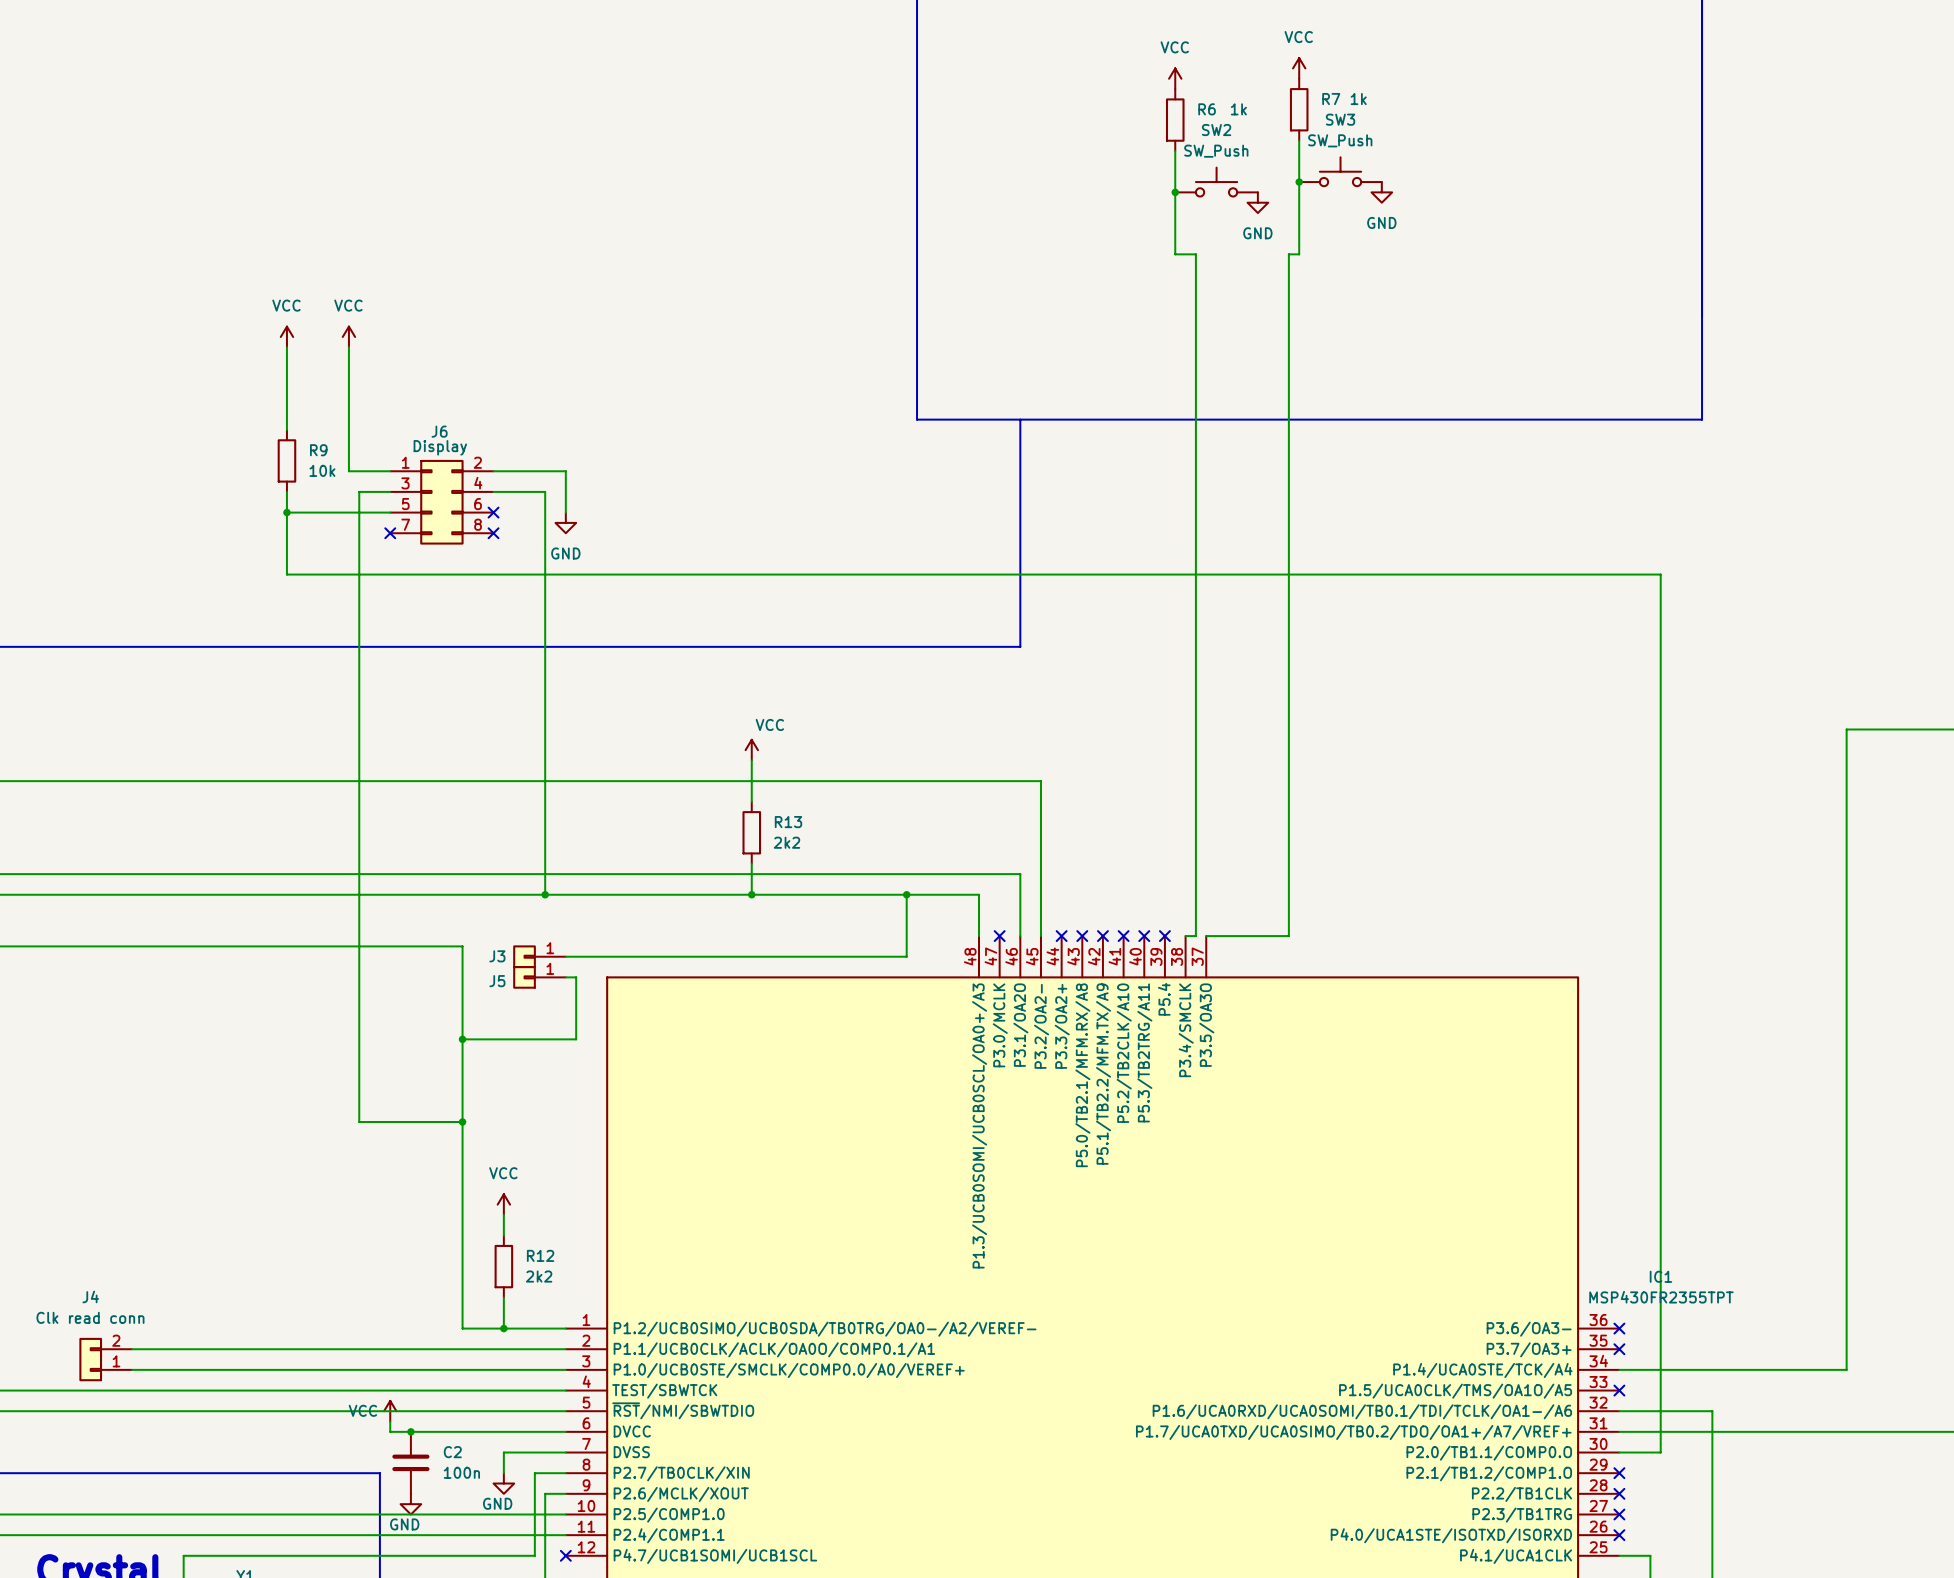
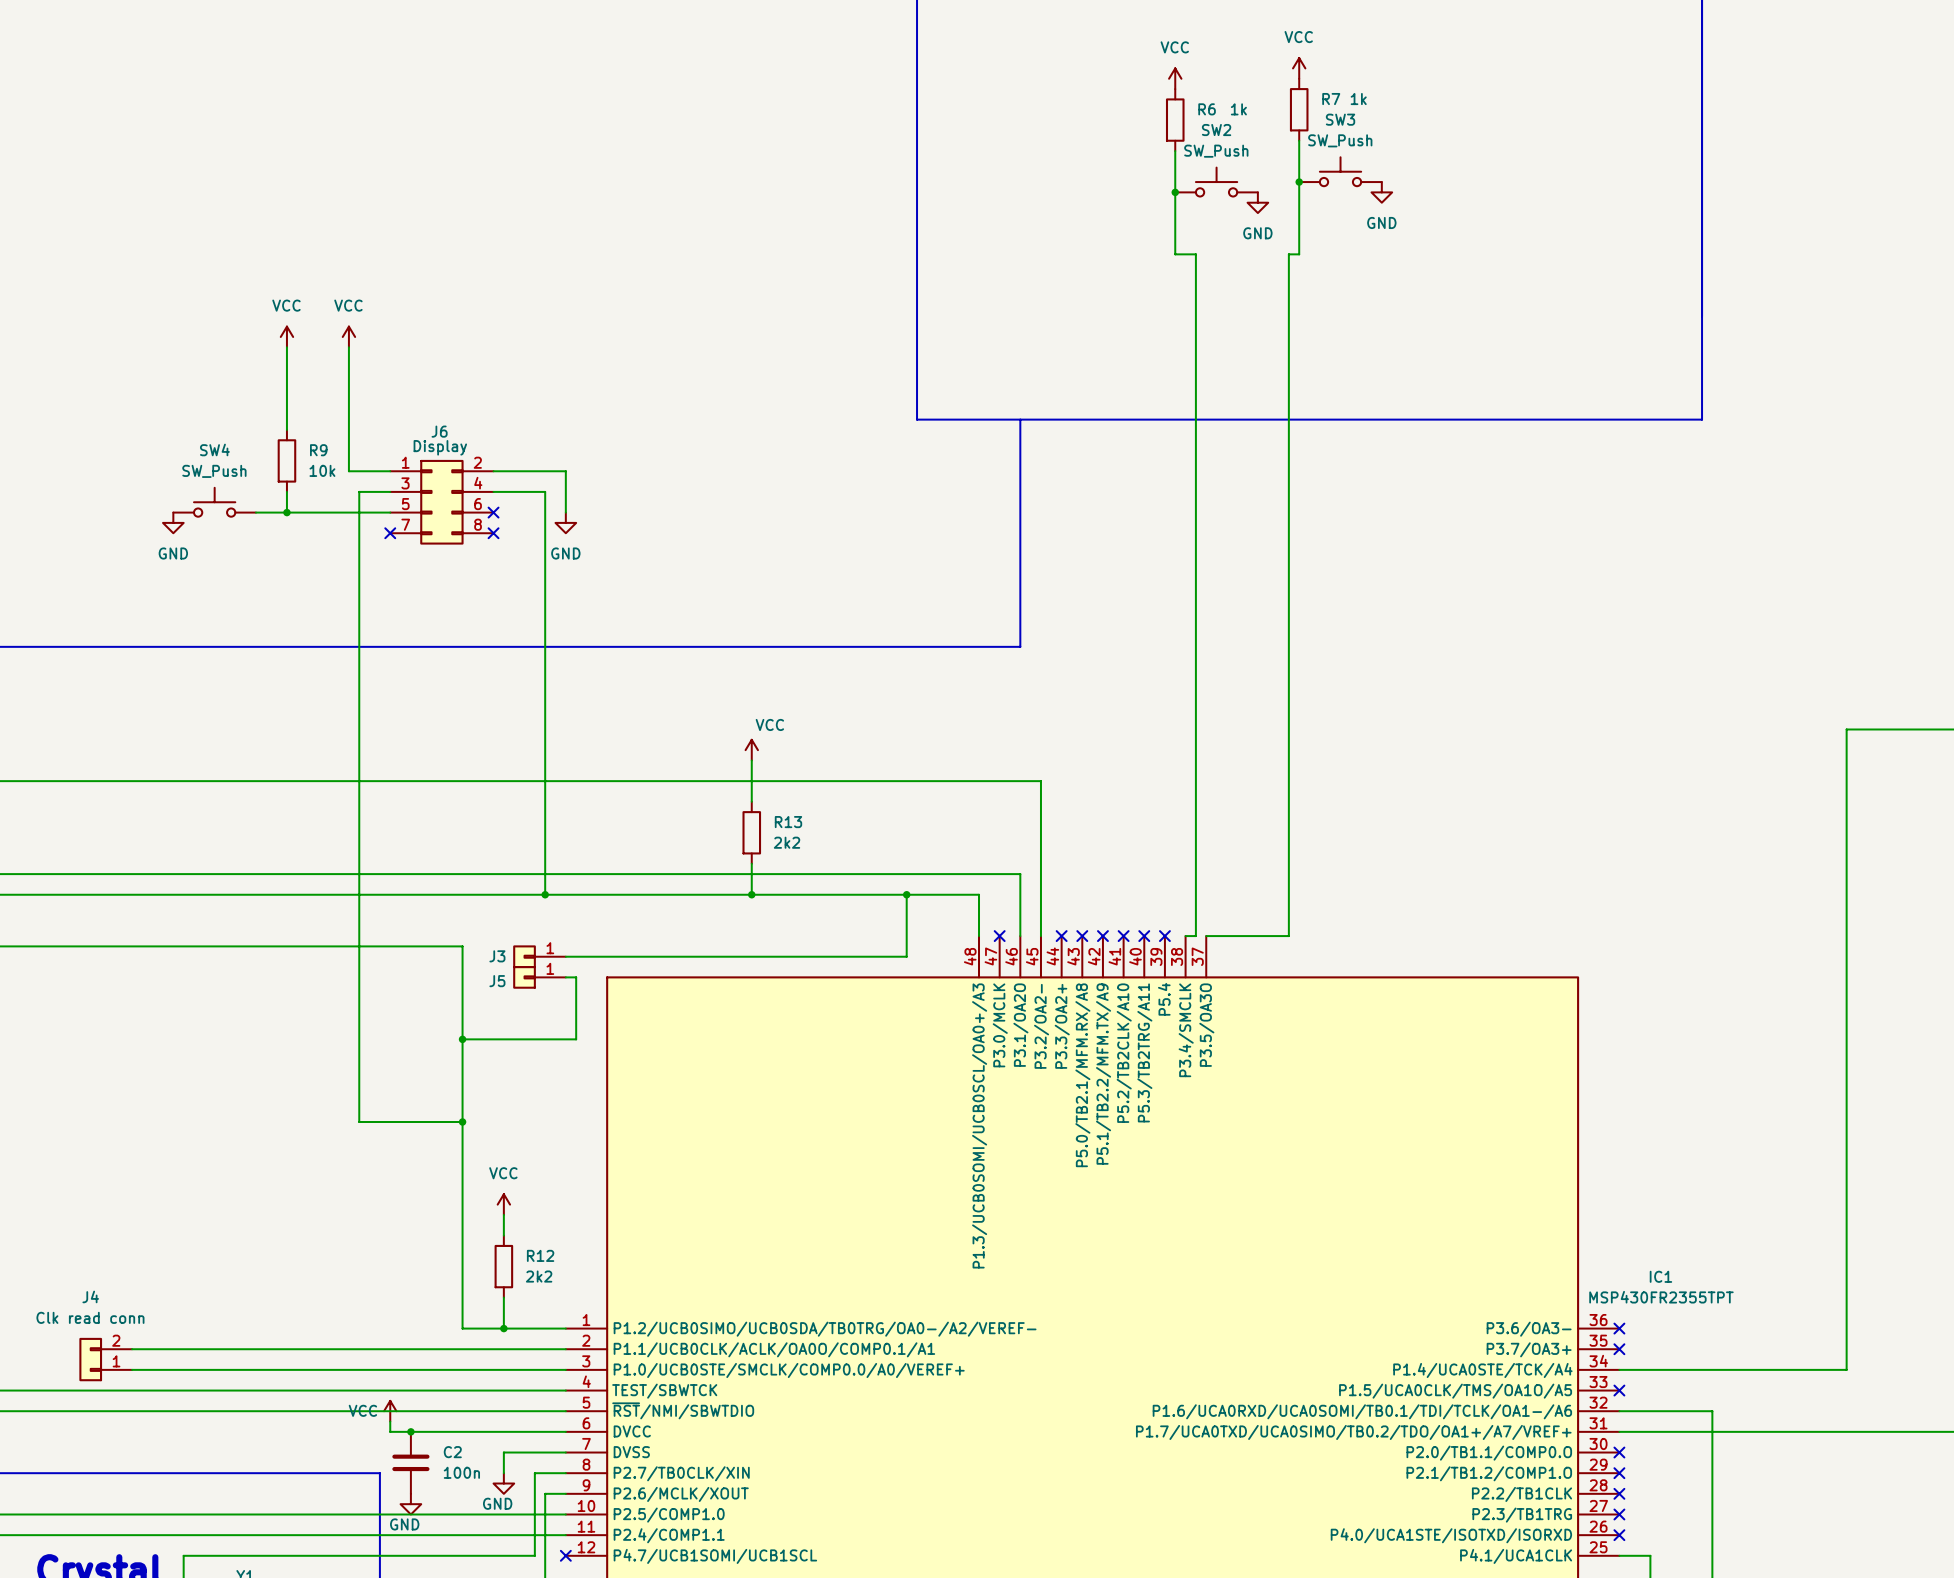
SW4: none -> SW_Push (214, 502)
wire: (286, 512) (286, 574) (1660, 574) (1660, 1452) (1619, 1452) -> (286, 512) (255, 512)
power symbol: none -> GND (173, 522)
no-connect mark: none -> (1619, 1452)

